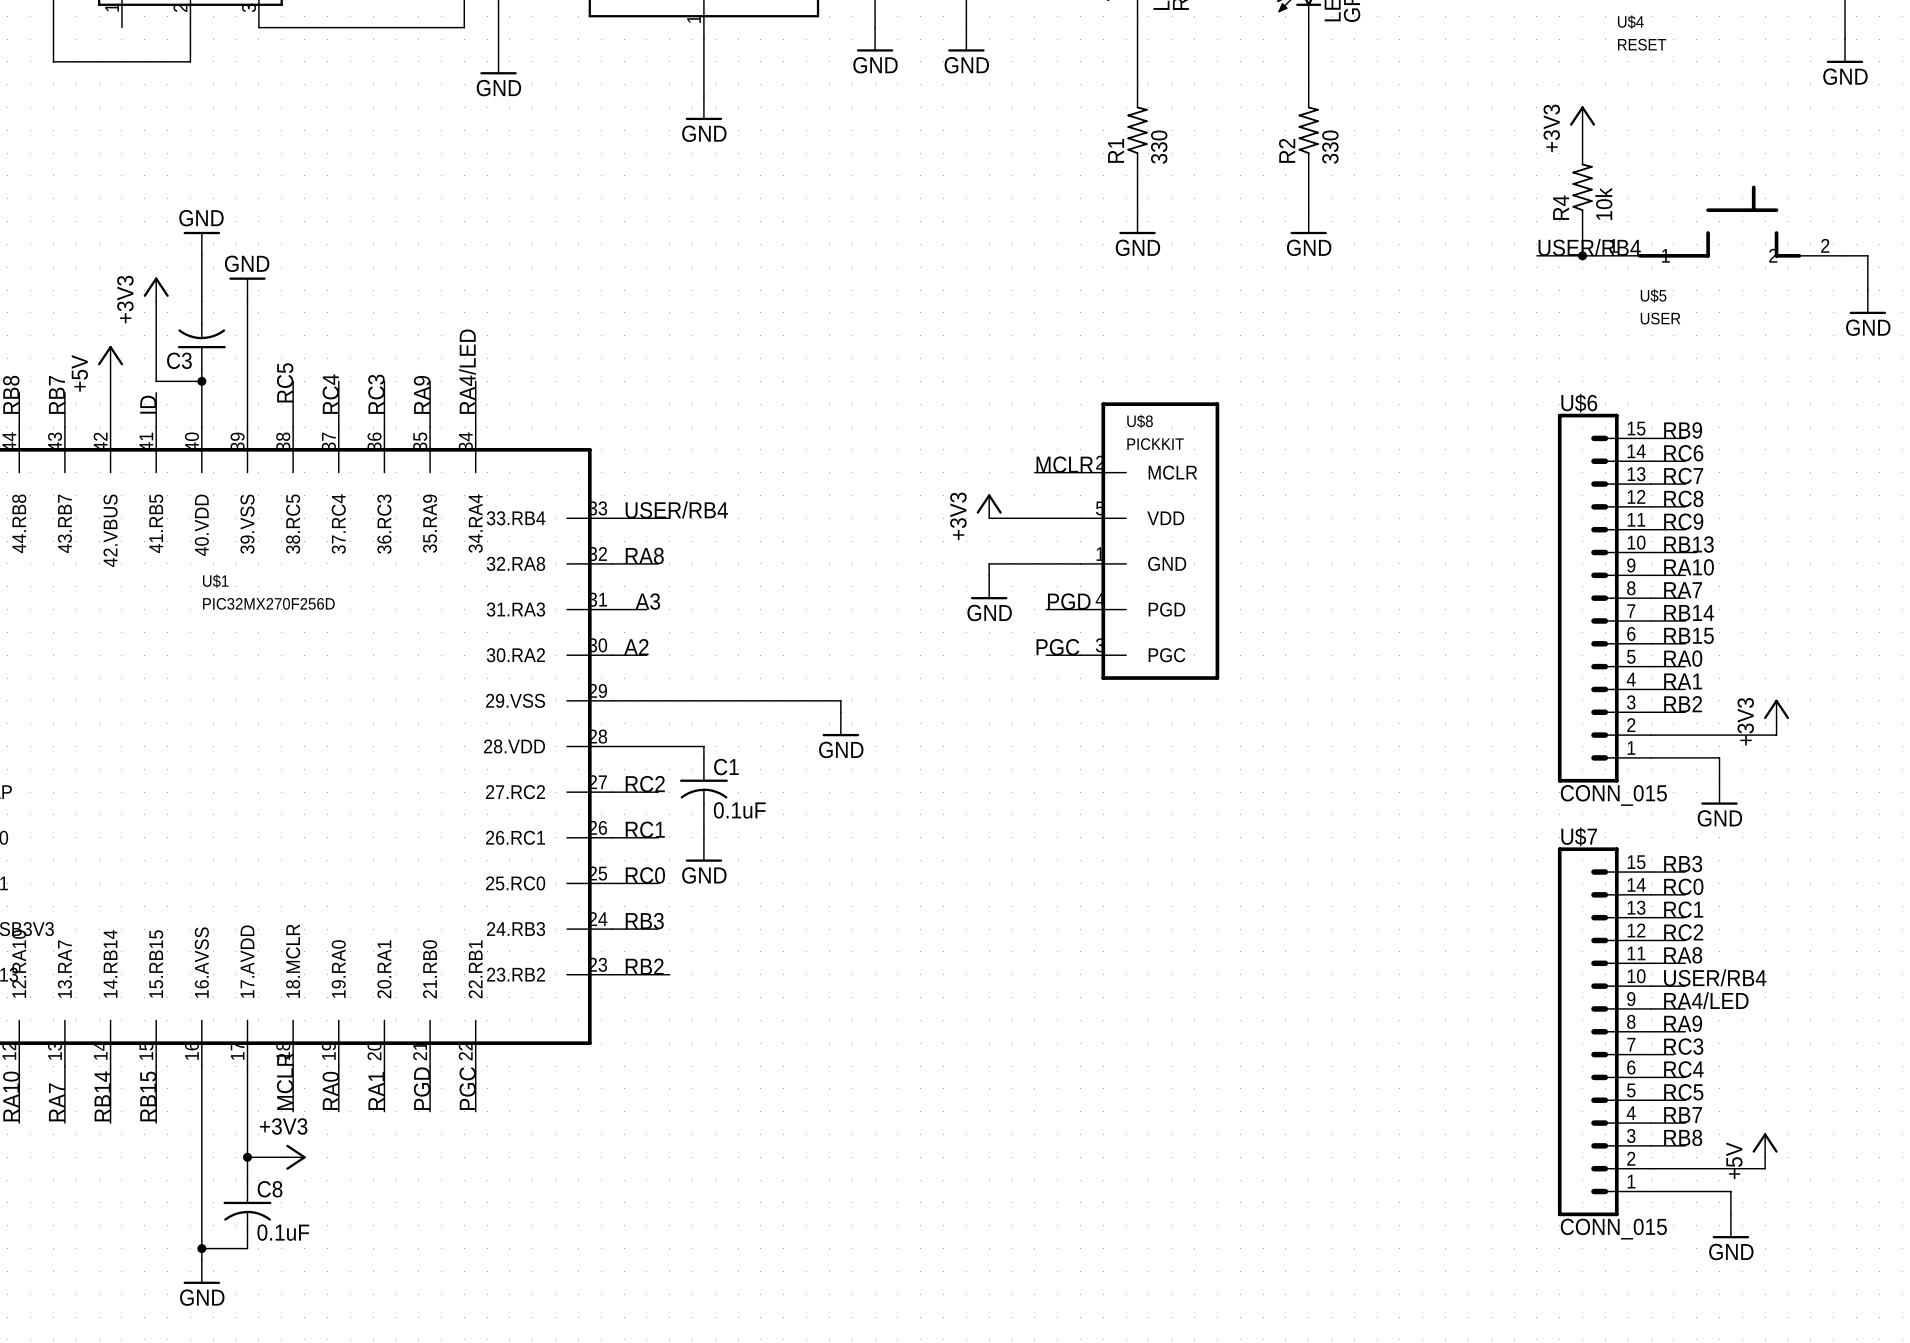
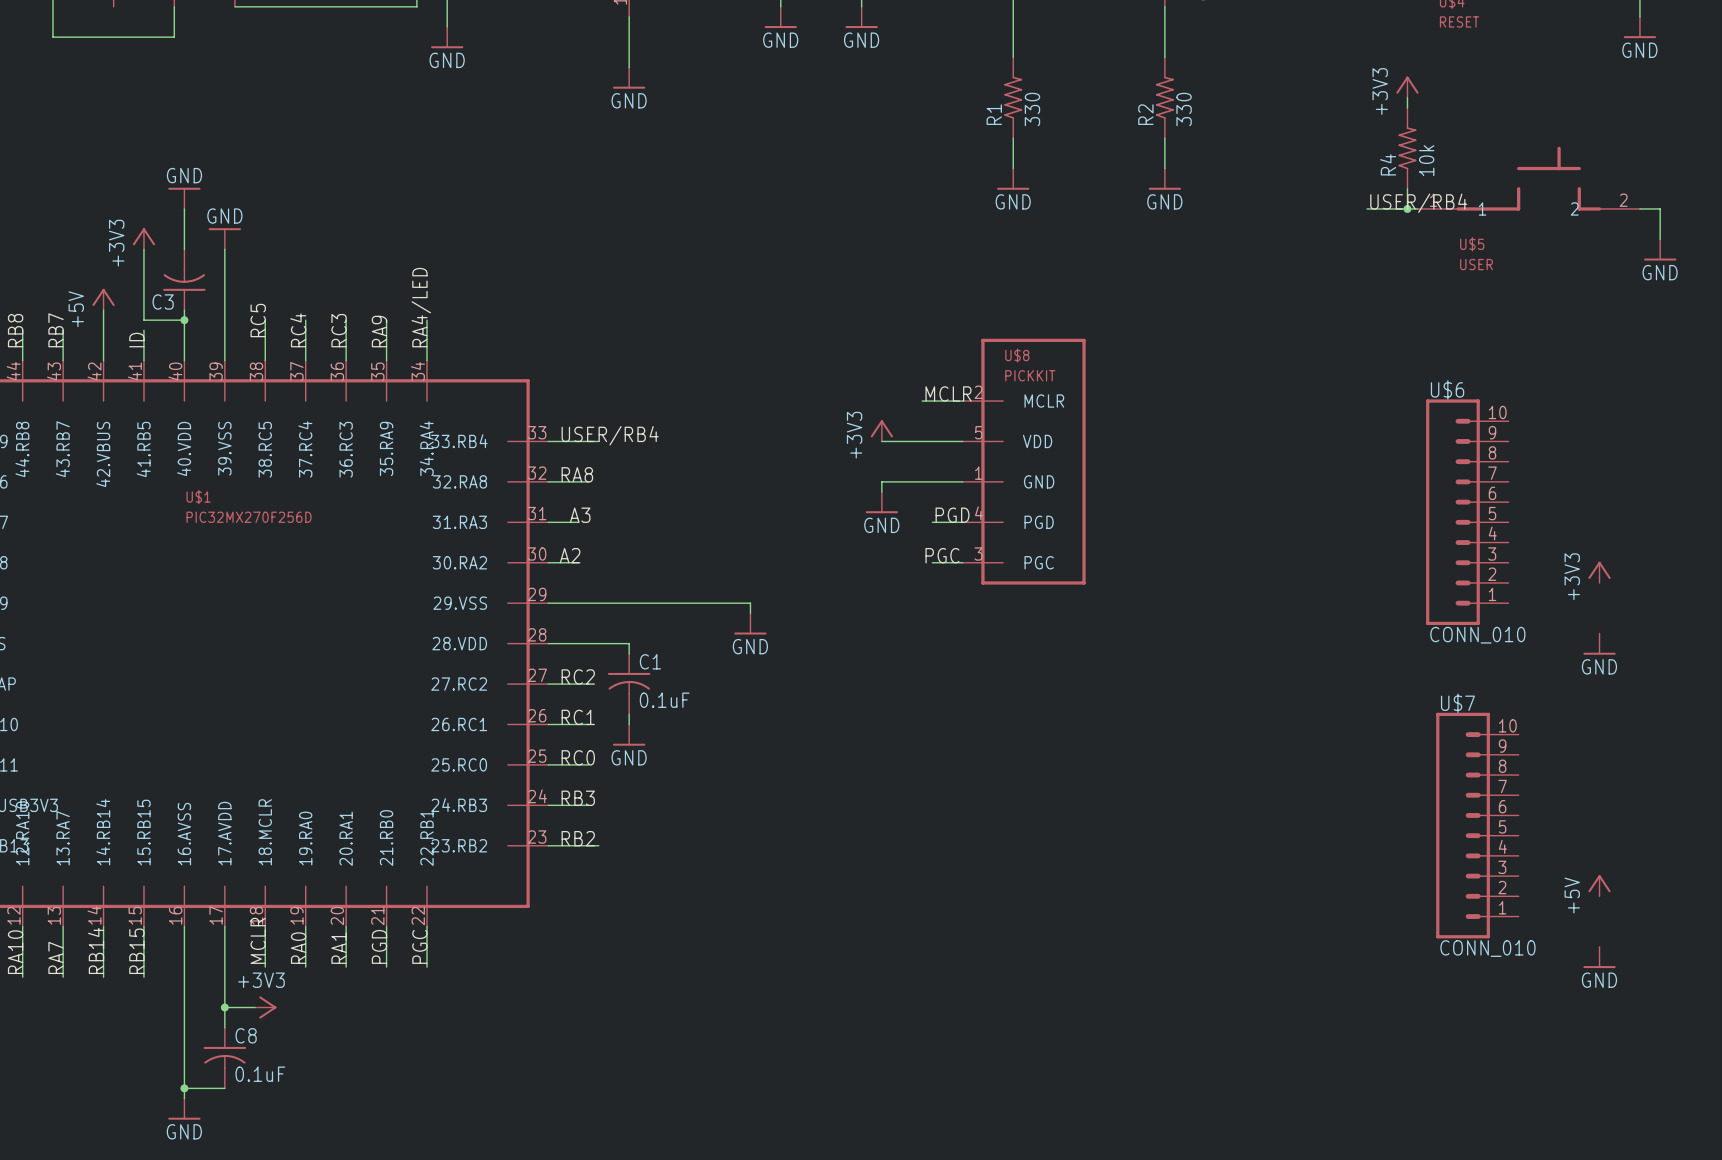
U$6 name position: U$6 (1579, 403) -> U$6 (1447, 389)
U$6 symbol: [1557, 413, 1652, 783] -> [1426, 399, 1509, 626]
label: RB9 (1683, 430) -> none
wire: (1651, 438) (1685, 438) -> none
label: RC6 (1683, 453) -> none
wire: (1651, 461) (1685, 461) -> none
label: RC7 (1683, 476) -> none
wire: (1651, 484) (1685, 484) -> none
label: RC8 (1683, 498) -> none
wire: (1651, 506) (1685, 506) -> none
label: RC9 (1683, 521) -> none
wire: (1651, 529) (1685, 529) -> none
label: RB13 (1688, 544) -> none
wire: (1651, 552) (1696, 552) -> none
label: RA10 (1689, 567) -> none
wire: (1651, 575) (1685, 575) -> none
label: RA7 (1683, 590) -> none
wire: (1651, 598) (1685, 598) -> none
label: RB14 (1689, 612) -> none
wire: (1651, 620) (1685, 620) -> none
label: RB15 (1688, 635) -> none
wire: (1651, 643) (1685, 643) -> none
label: RA0 (1683, 658) -> none
wire: (1651, 666) (1685, 666) -> none
label: RA1 (1683, 681) -> none
wire: (1651, 689) (1685, 689) -> none
label: RB2 (1683, 704) -> none
power symbol position: +3V3 (1776, 711) -> +3V3 (1599, 572)
wire: (1651, 712) (1685, 712) -> none
wire: (1776, 723) (1776, 735) (1651, 735) -> none
wire: (1651, 757) (1719, 757) (1719, 780) -> none
power symbol position: GND (1719, 792) -> GND (1599, 644)
U$6 value: CONN_015 (1613, 795) -> CONN_010 (1477, 635)
U$7 name position: U$7 (1579, 836) -> U$7 (1457, 703)
U$7 symbol: [1557, 847, 1652, 1217] -> [1436, 712, 1519, 939]
label: RB3 (1683, 864) -> none
label: RC0 (1683, 886) -> none
label: RC1 (1683, 909) -> none
label: RC2 (1683, 932) -> none
label: RA8 (1683, 955) -> none
label: USER/RB4 (1715, 977) -> none
label: RA4/LED (1706, 1000) -> none
label: RA9 (1683, 1023) -> none
label: RC3 (1683, 1046) -> none
label: RC4 (1683, 1069) -> none
label: RC5 (1683, 1092) -> none
wire: (1651, 1100) (1685, 1100) -> none
label: RB7 (1683, 1115) -> none
wire: (1651, 1123) (1685, 1123) -> none
label: RB8 (1683, 1137) -> none
wire: (1651, 1145) (1685, 1145) -> none
power symbol position: +5V (1765, 1145) -> +5V (1599, 885)
wire: (1765, 1157) (1765, 1168) (1651, 1168) -> none
wire: (1651, 1191) (1730, 1191) (1730, 1214) -> none
power symbol position: GND (1730, 1226) -> GND (1599, 957)
U$7 value: CONN_015 (1613, 1229) -> CONN_010 (1487, 948)

